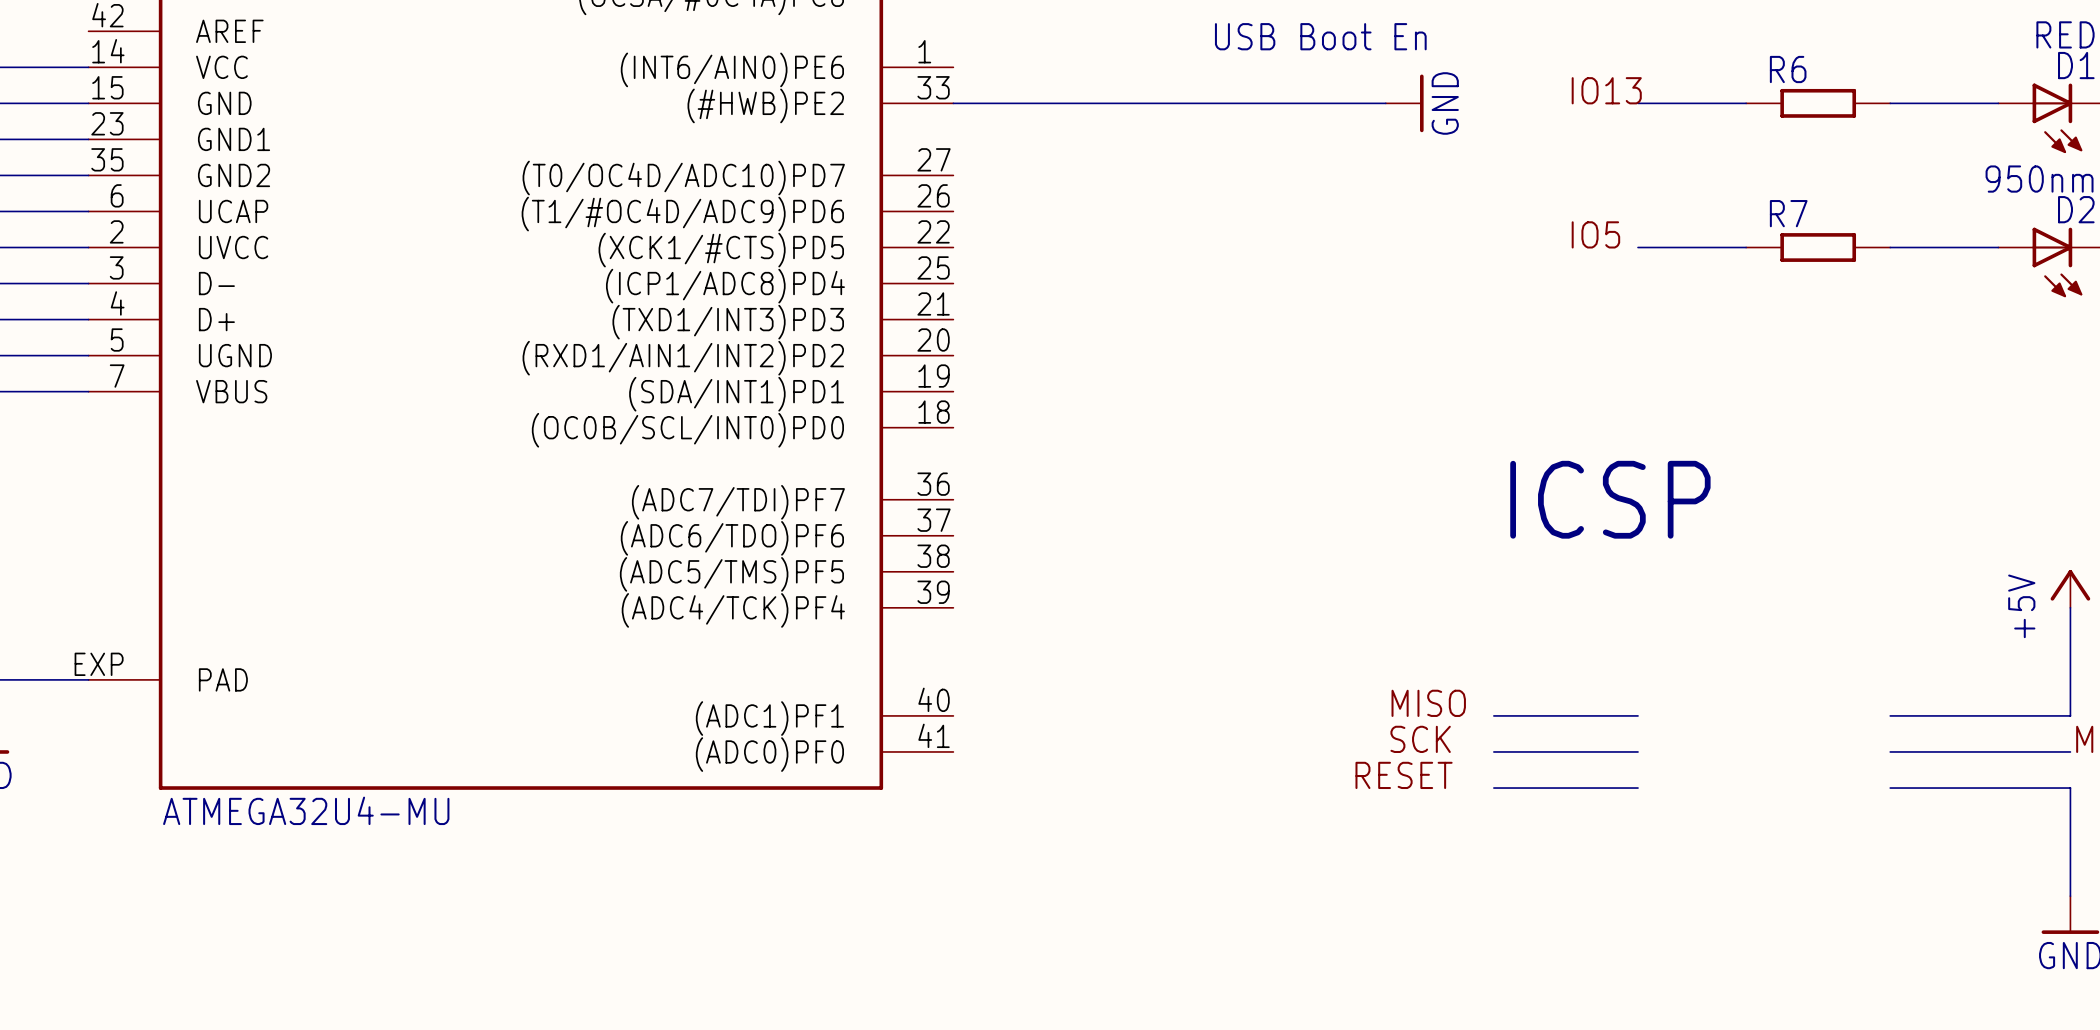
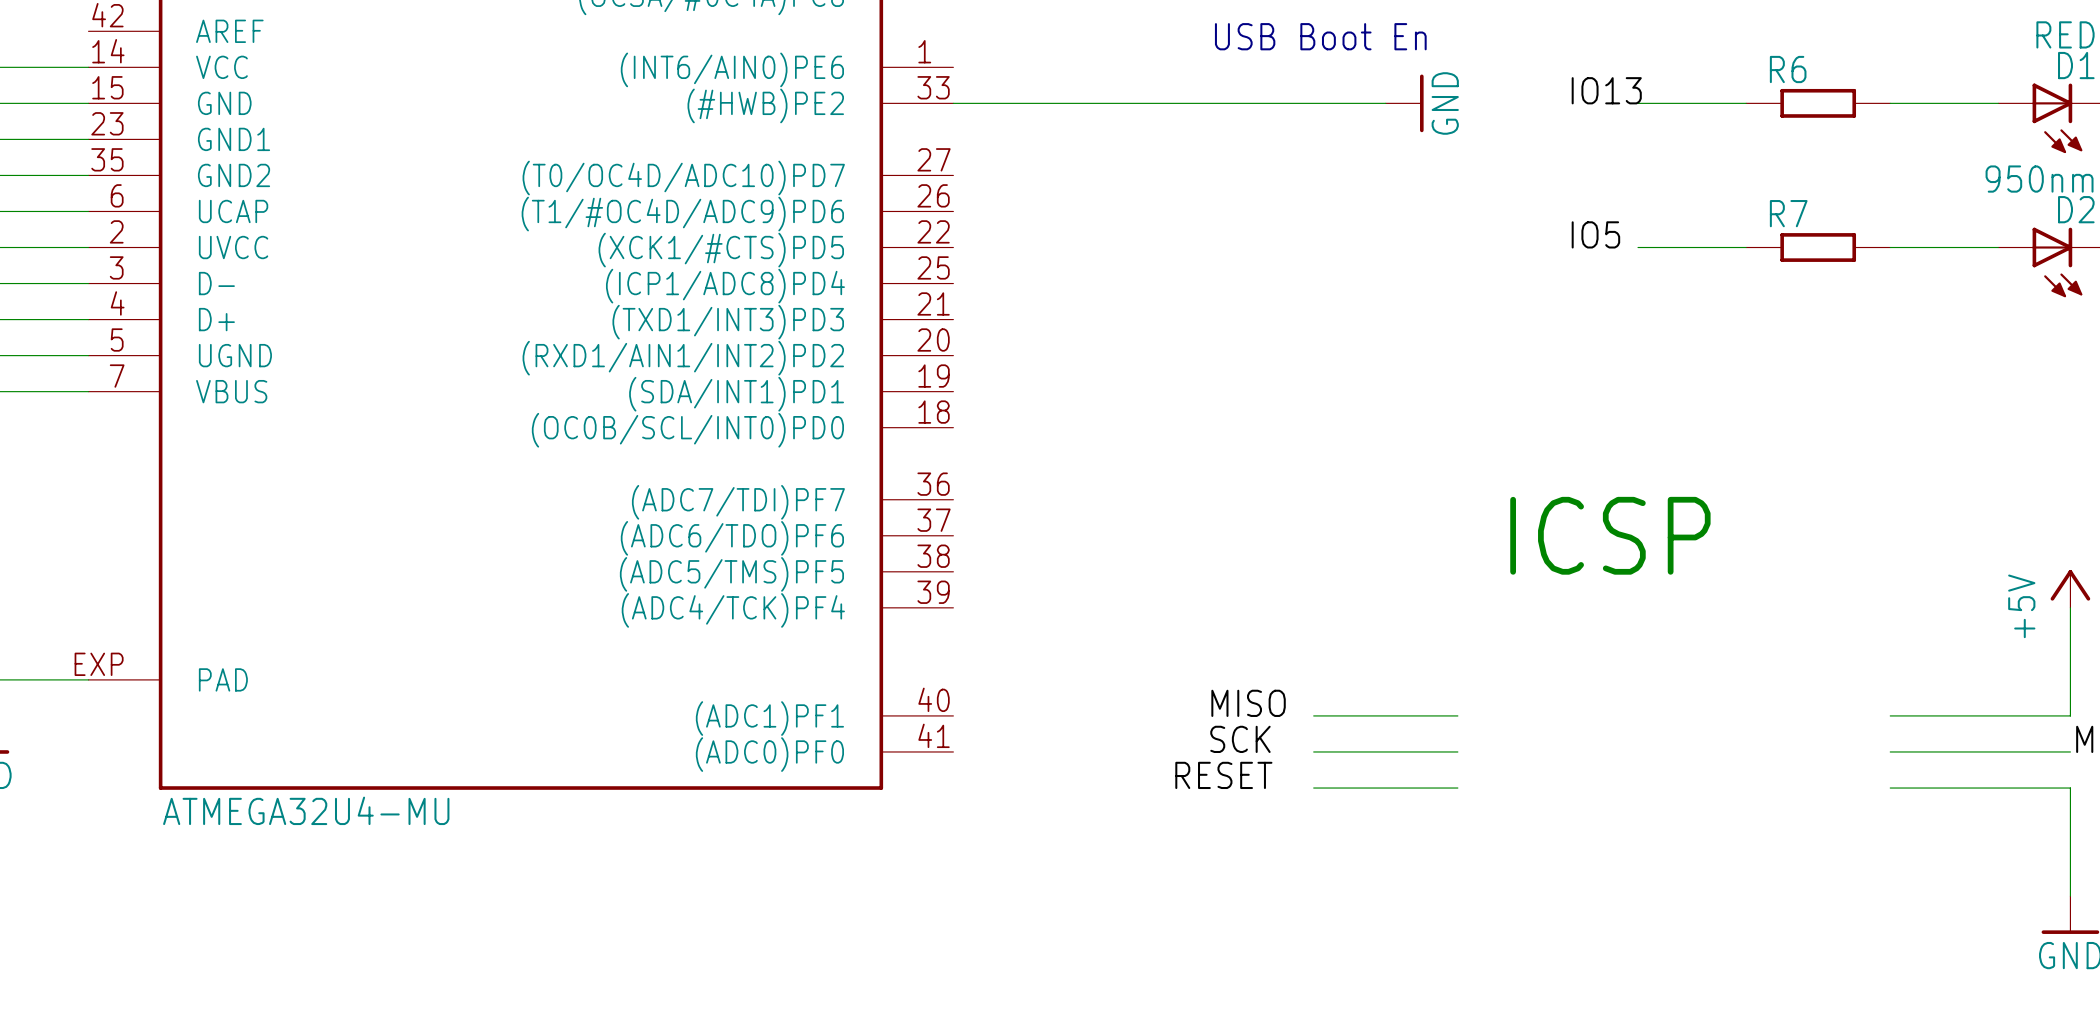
text position: ICSP (1610, 499) -> ICSP (1610, 535)
label position: MISO (1428, 703) -> MISO (1248, 703)
wire: (1493, 715) (1638, 715) -> (1313, 715) (1457, 715)
label position: SCK (1420, 739) -> SCK (1240, 739)
wire: (1493, 751) (1638, 751) -> (1313, 751) (1457, 751)
label position: RESET (1404, 775) -> RESET (1223, 775)
wire: (1493, 788) (1638, 788) -> (1313, 788) (1457, 788)

